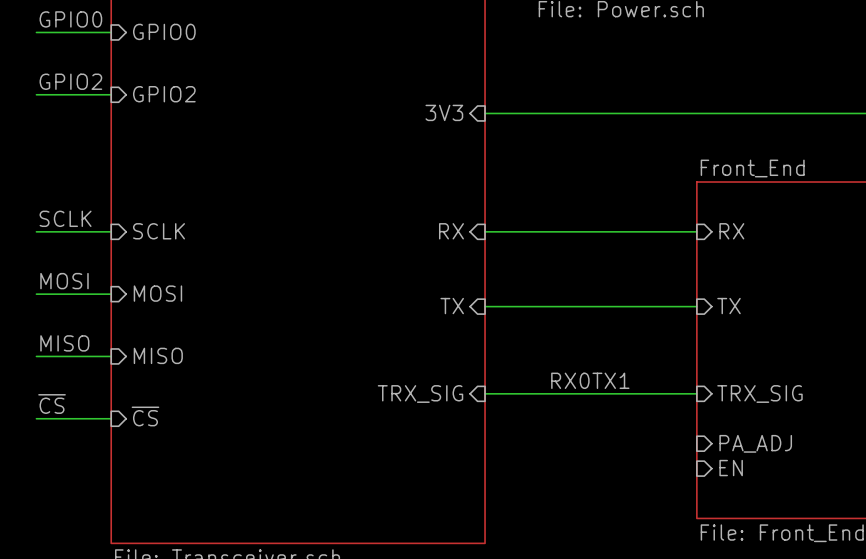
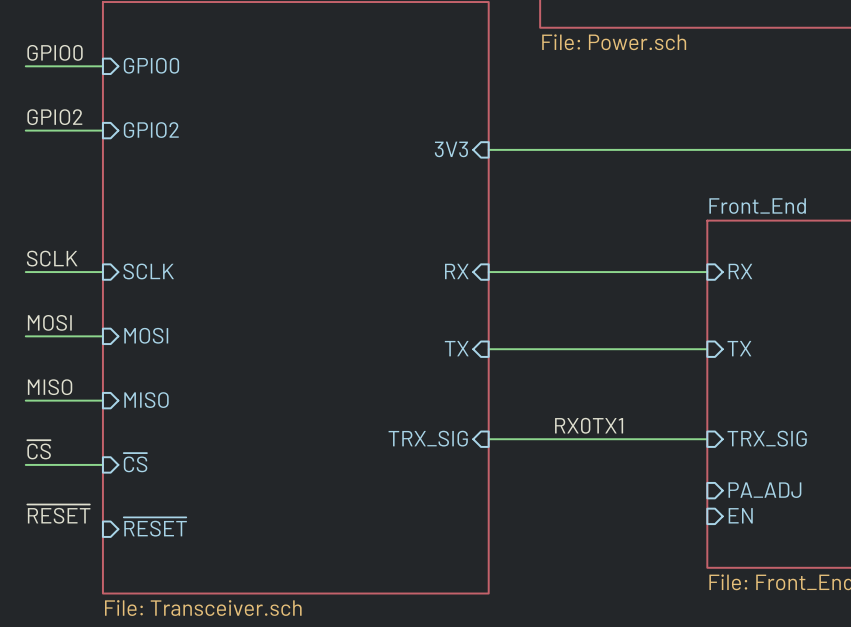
label: none -> ~{RESET} (58, 514)
sheet pin: none -> ~{RESET} (155, 526)

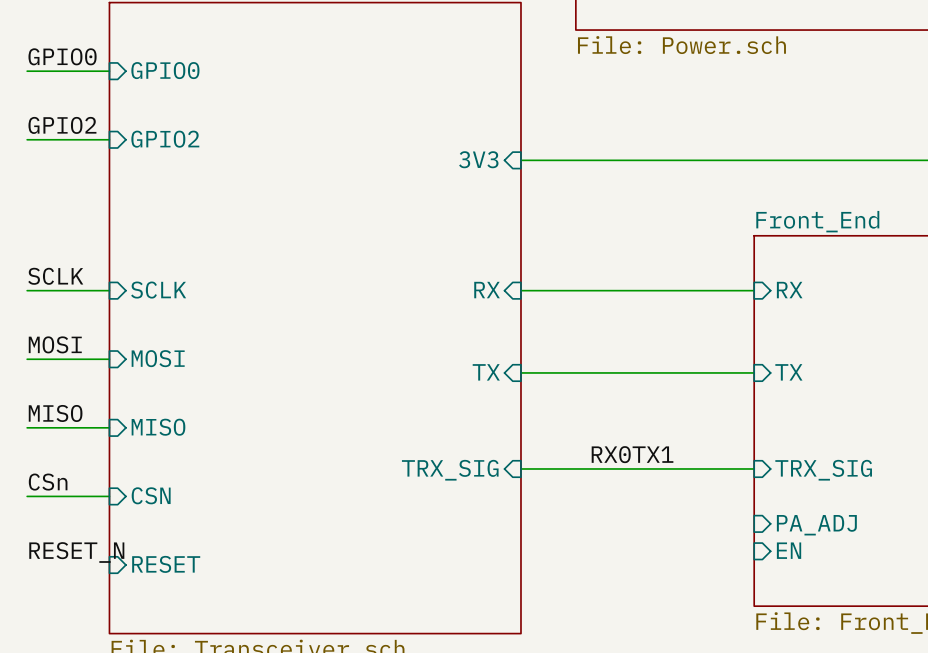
label: ~{CS} (39, 449) -> CSn (48, 482)
sheet pin: ~{CS} (135, 462) -> CSN (151, 495)
label: ~{RESET} (58, 514) -> RESET_N (76, 552)
sheet pin: ~{RESET} (155, 526) -> RESET (166, 564)

